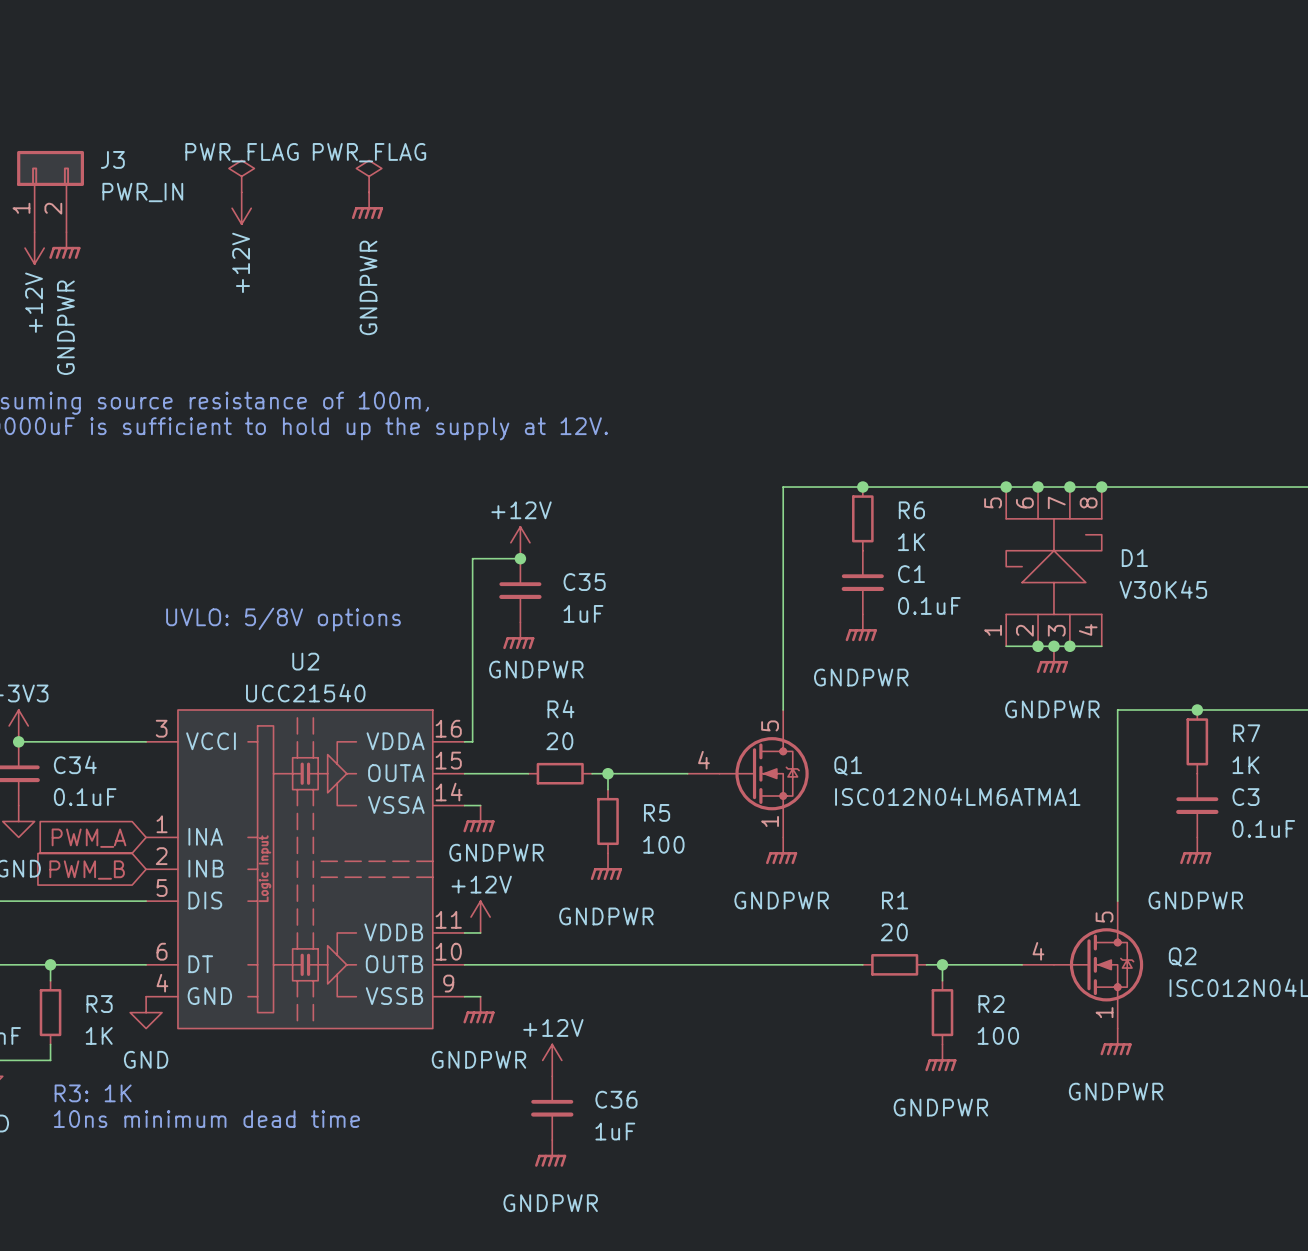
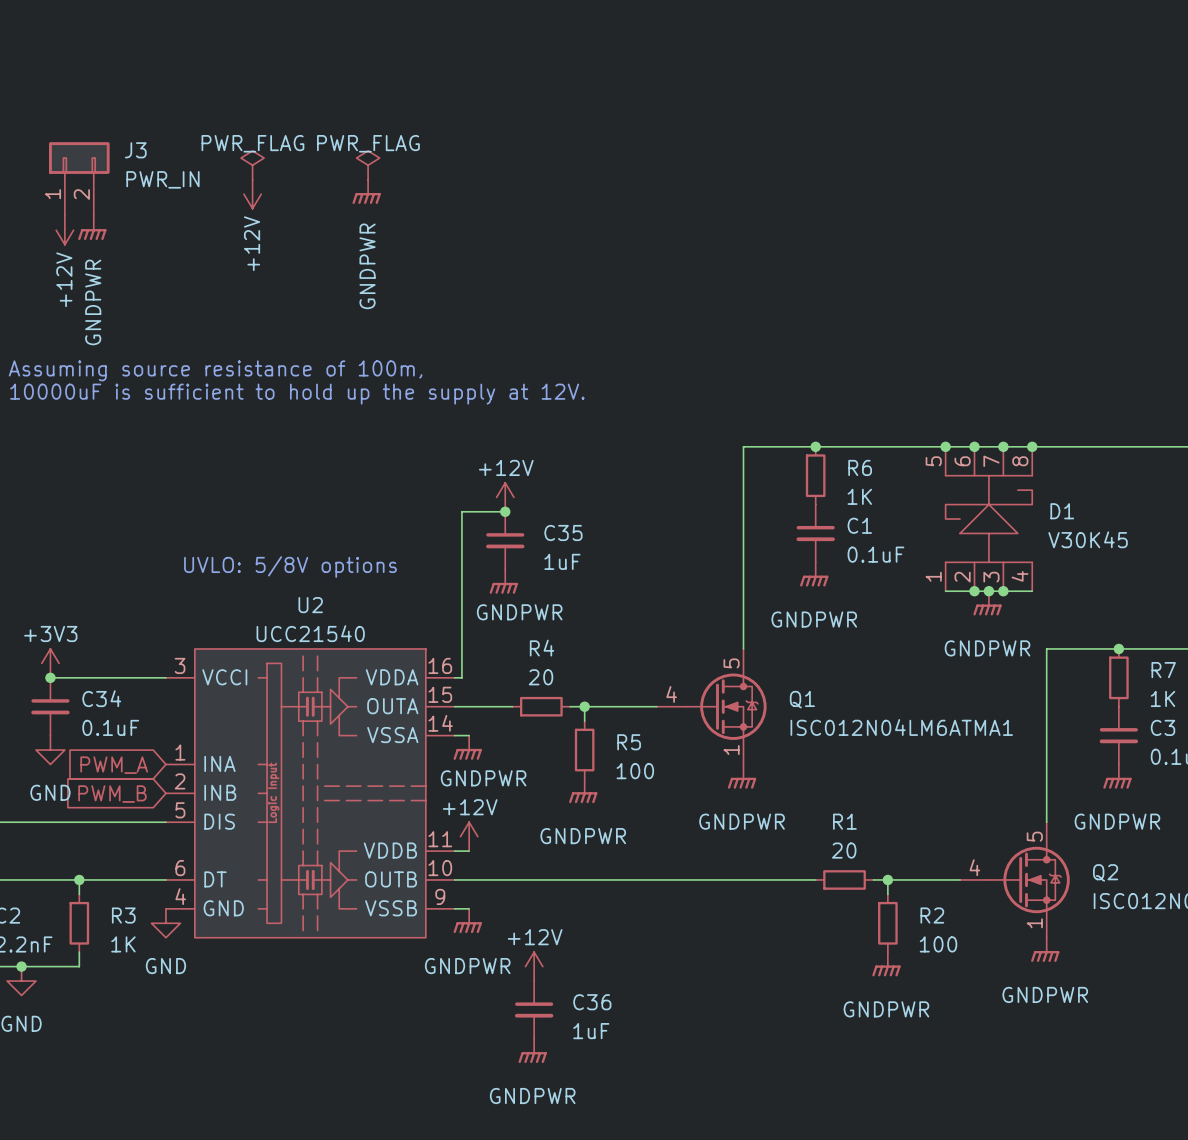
text: R3: 1K (93, 1093) -> none
text: 10ns minimum dead time (206, 1119) -> none

